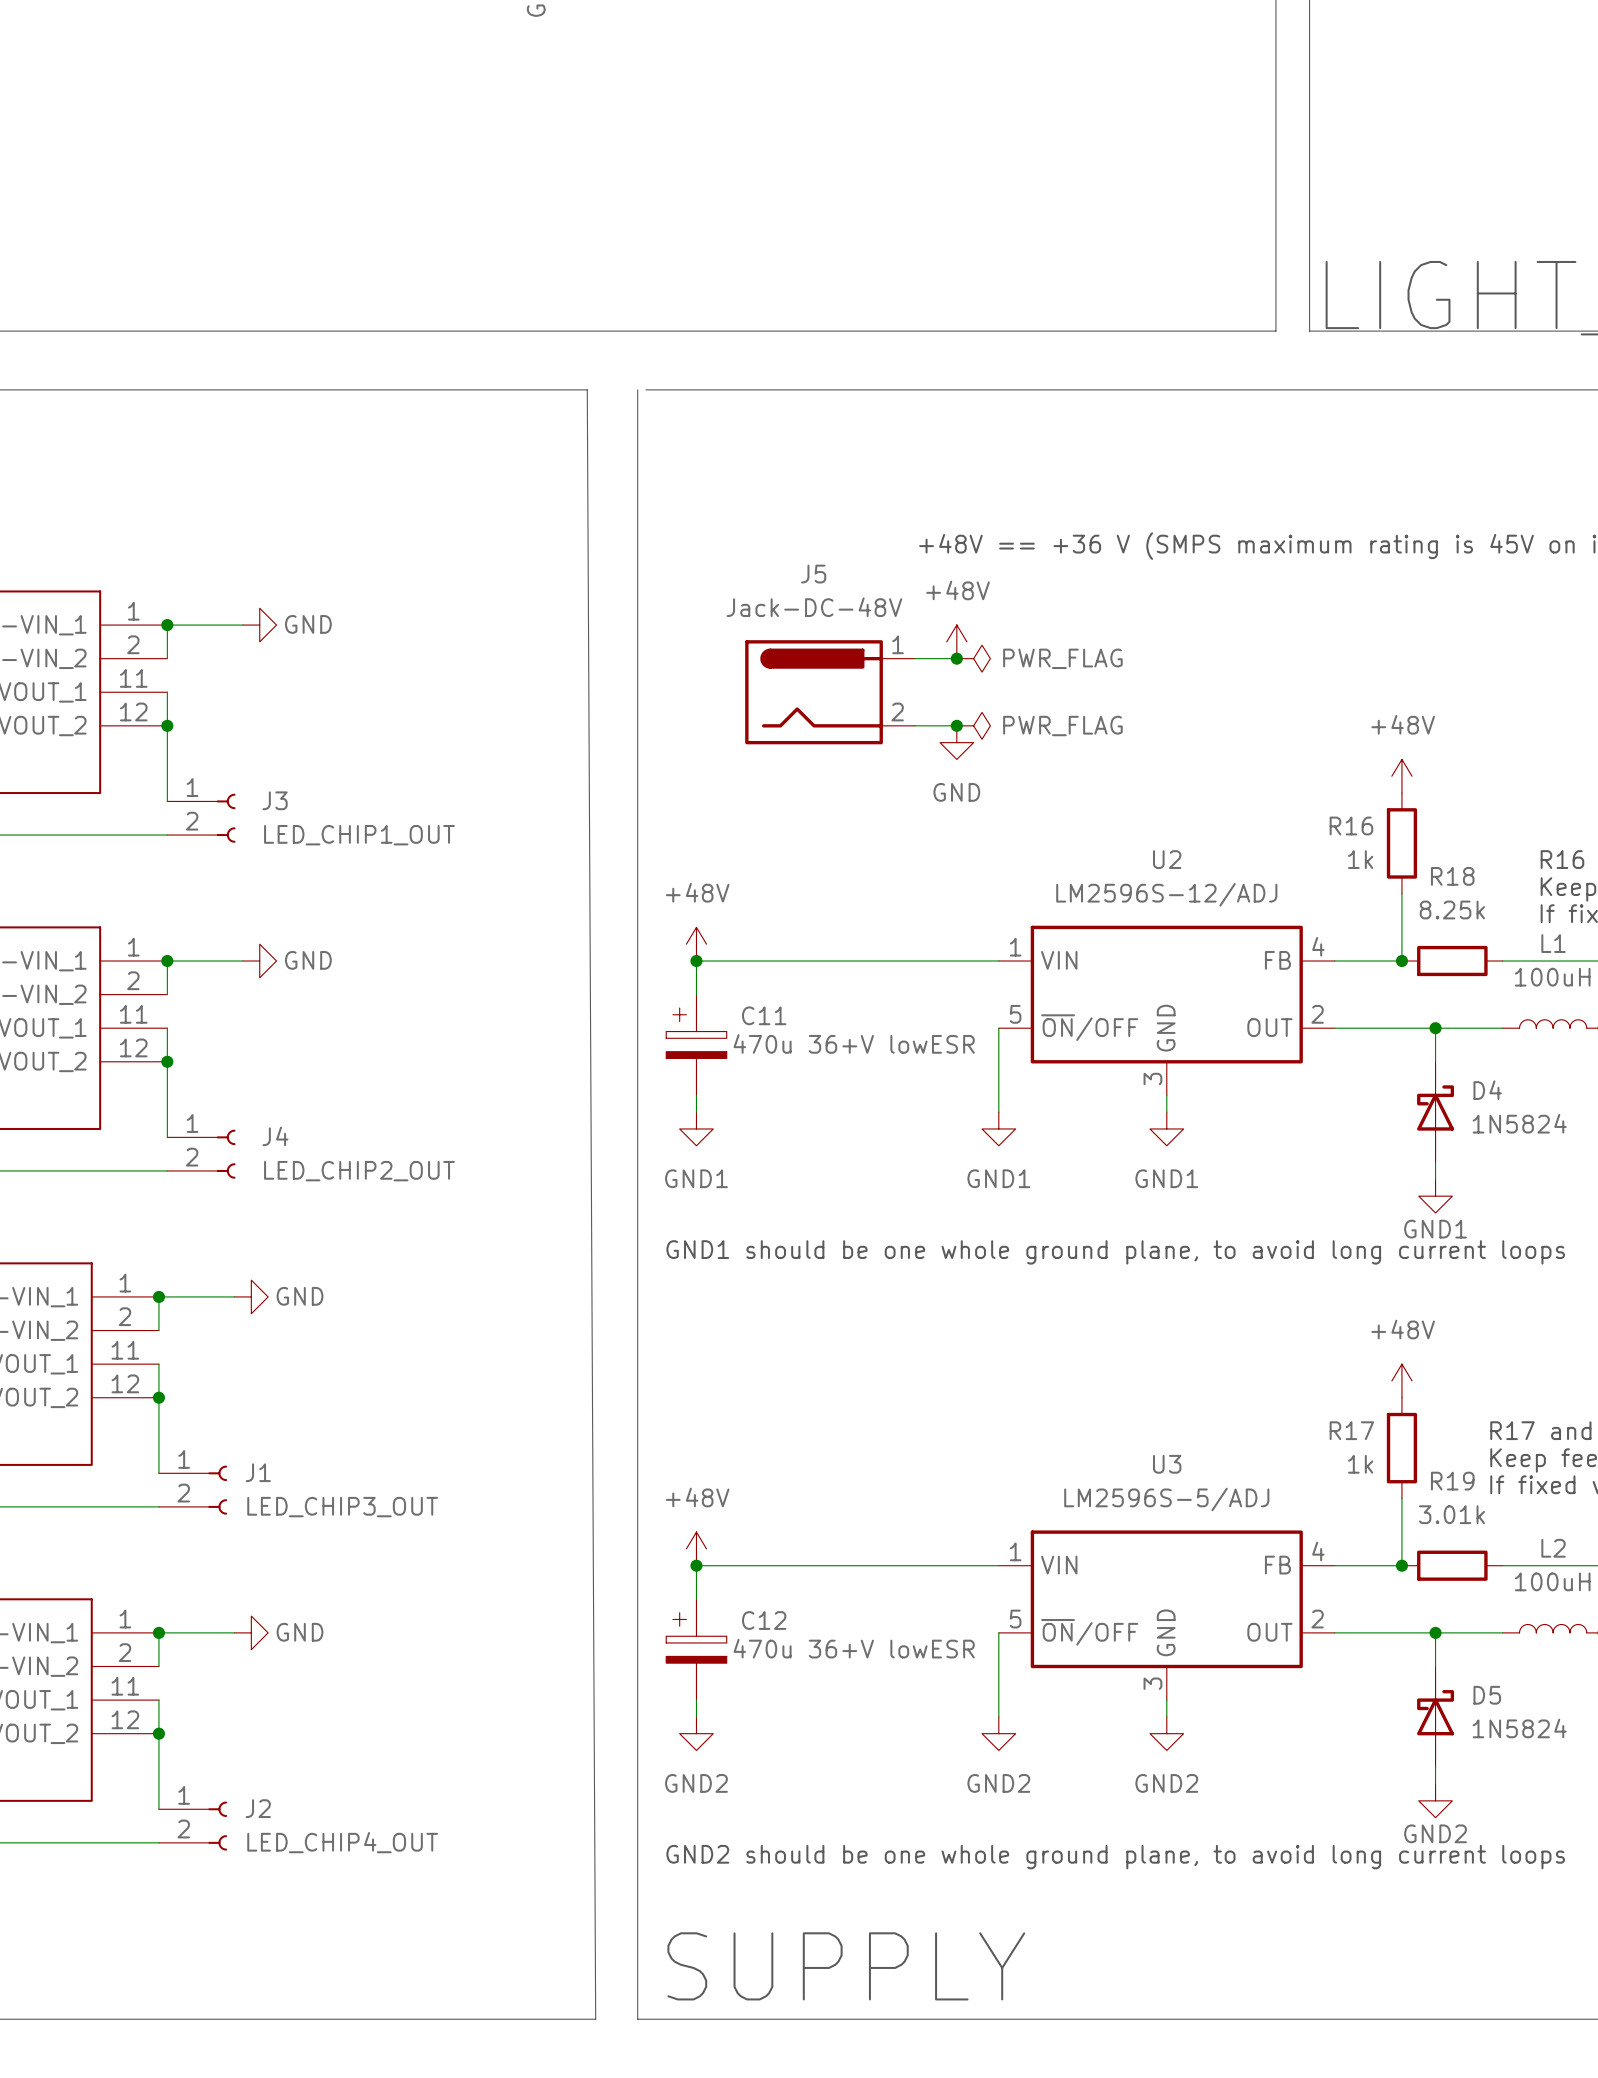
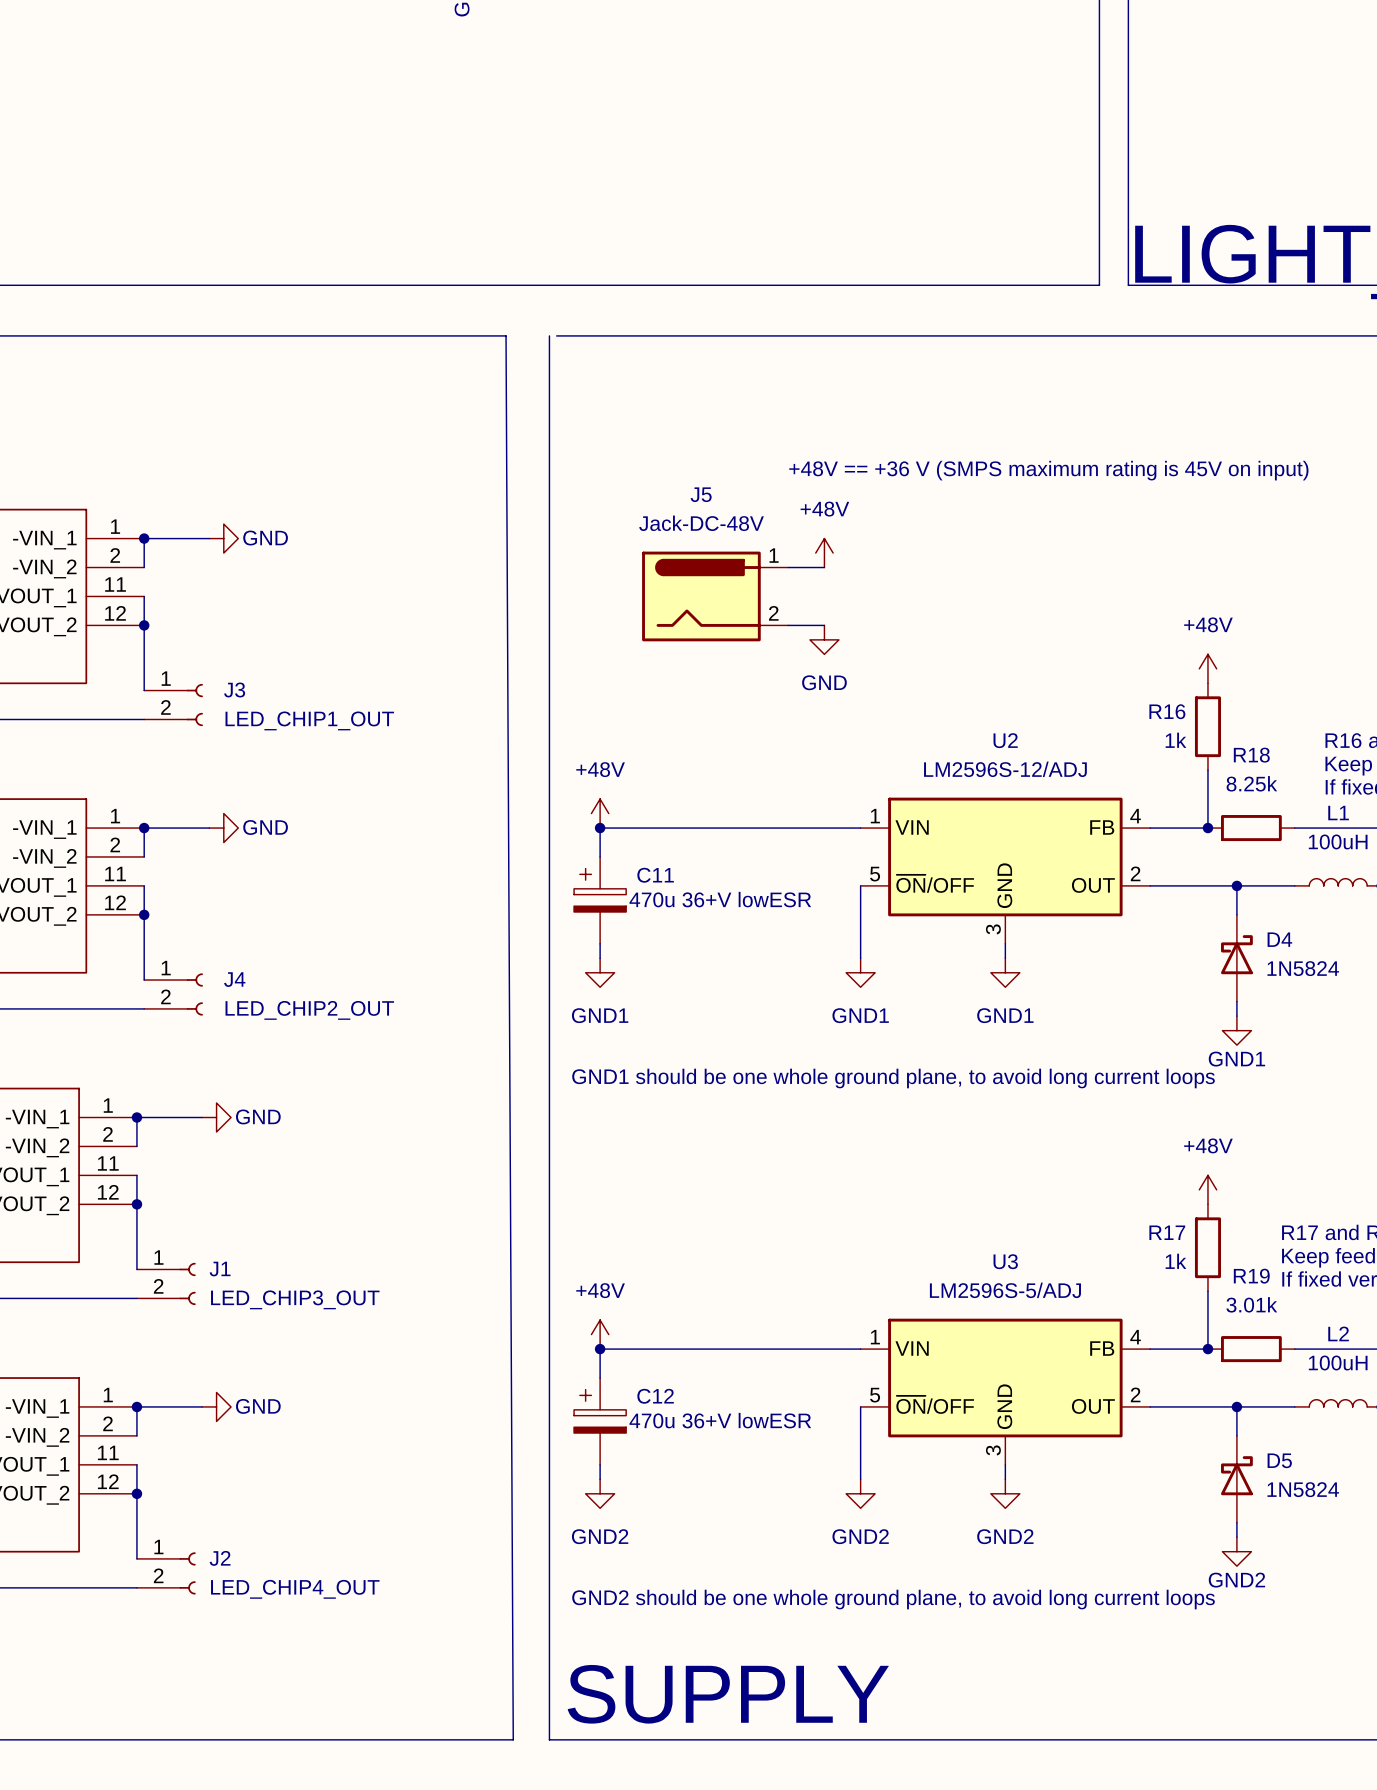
junction: (956, 658) -> none
power symbol: PWR_FLAG (973, 658) -> none
junction: (956, 725) -> none
power symbol: PWR_FLAG (973, 725) -> none

